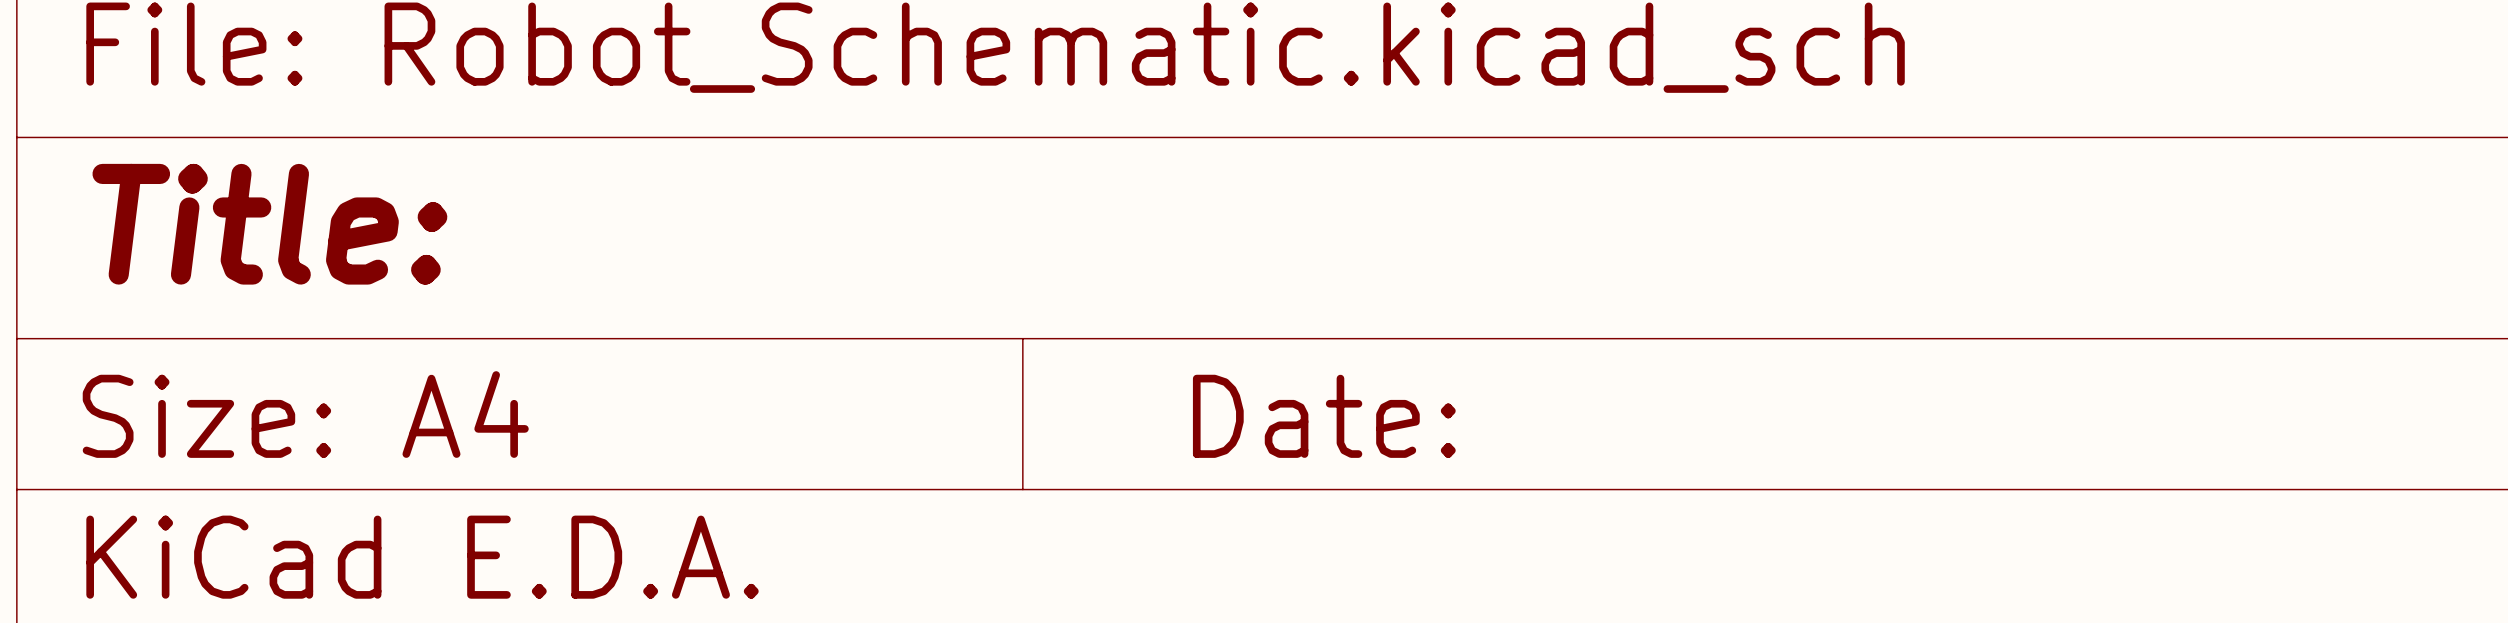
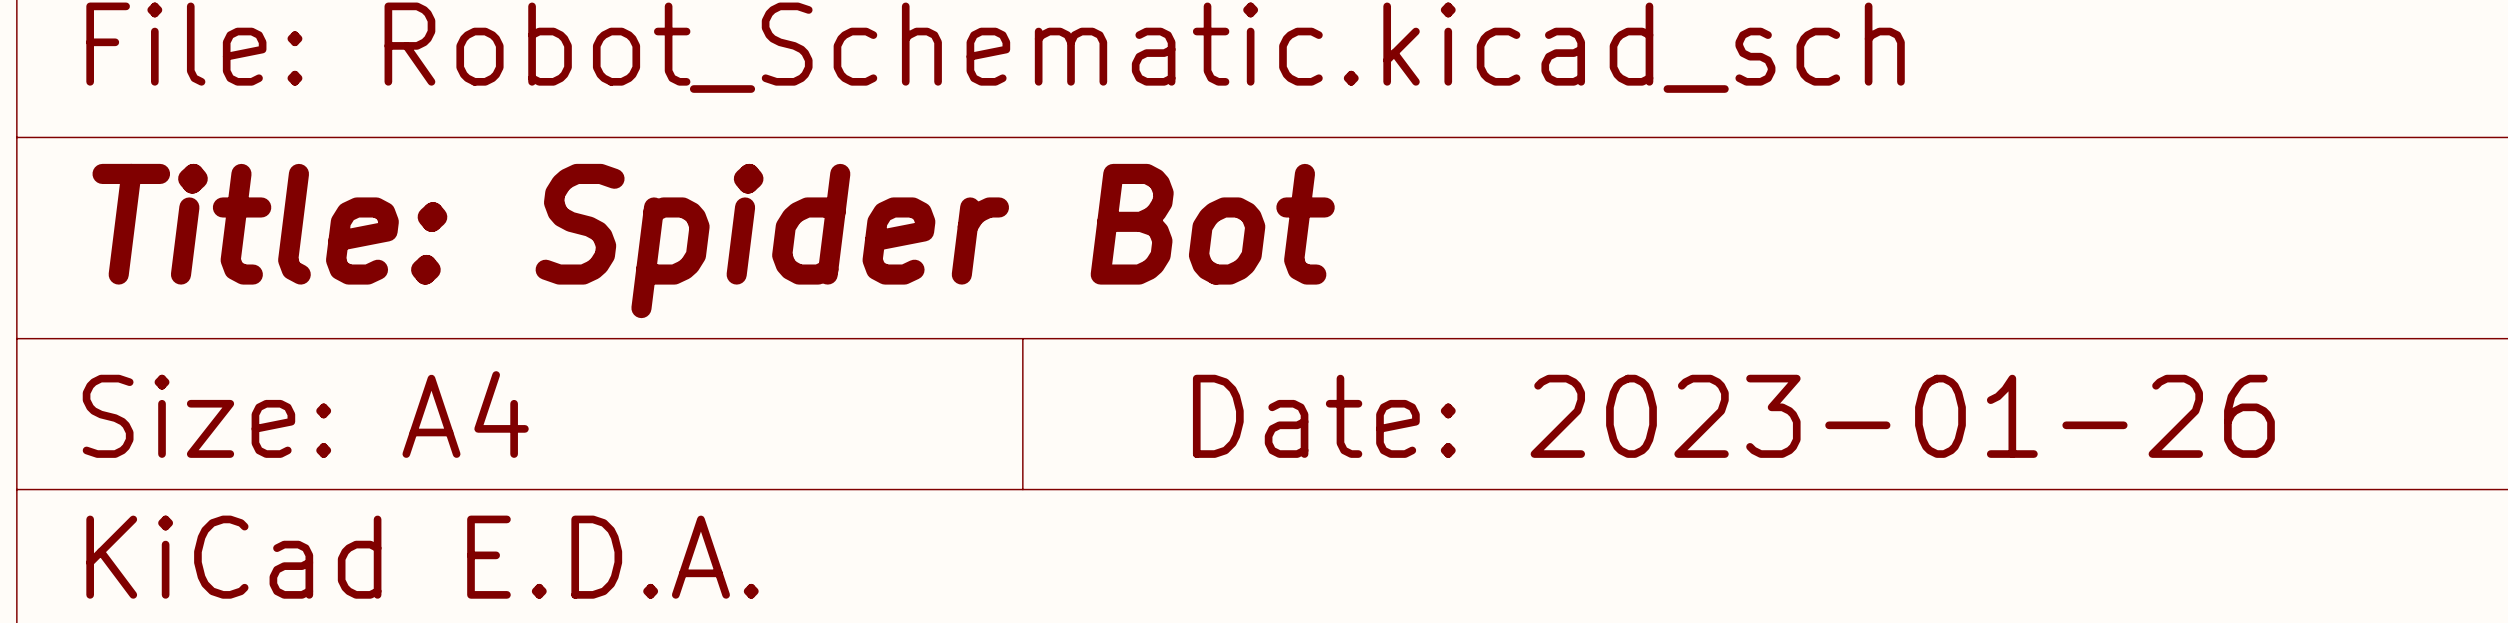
title block: Title: (269, 224) -> Title: Spider Bot (713, 241)
title block: Date: (1324, 416) -> Date: 2023-01-26 (1733, 416)

